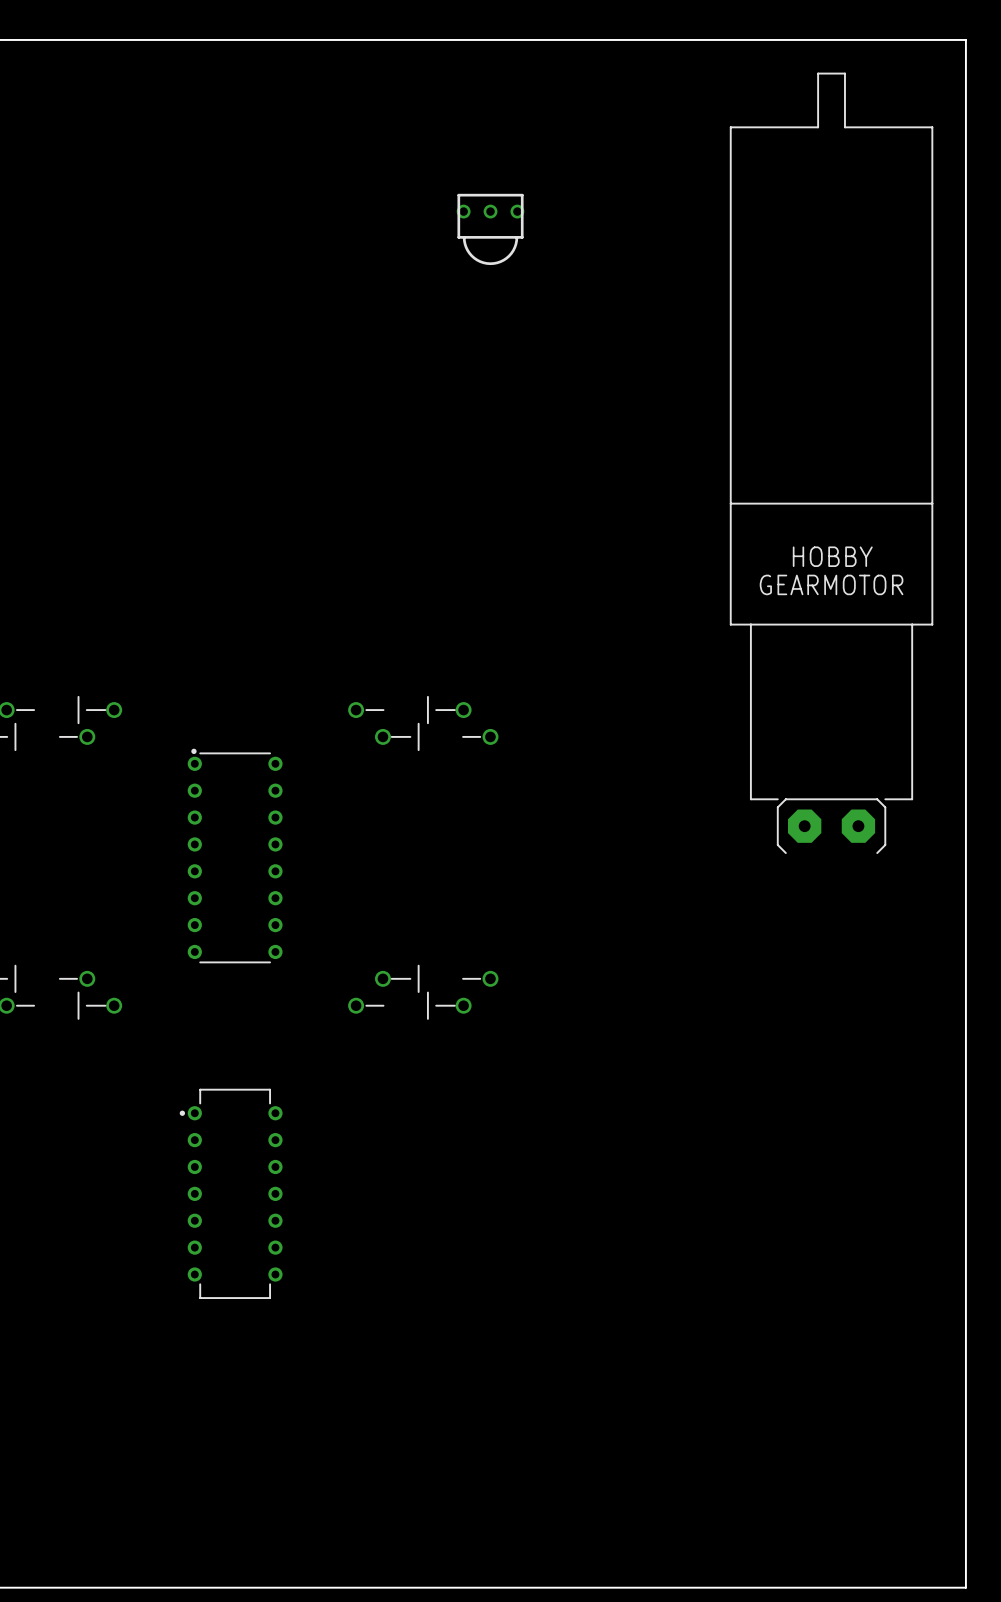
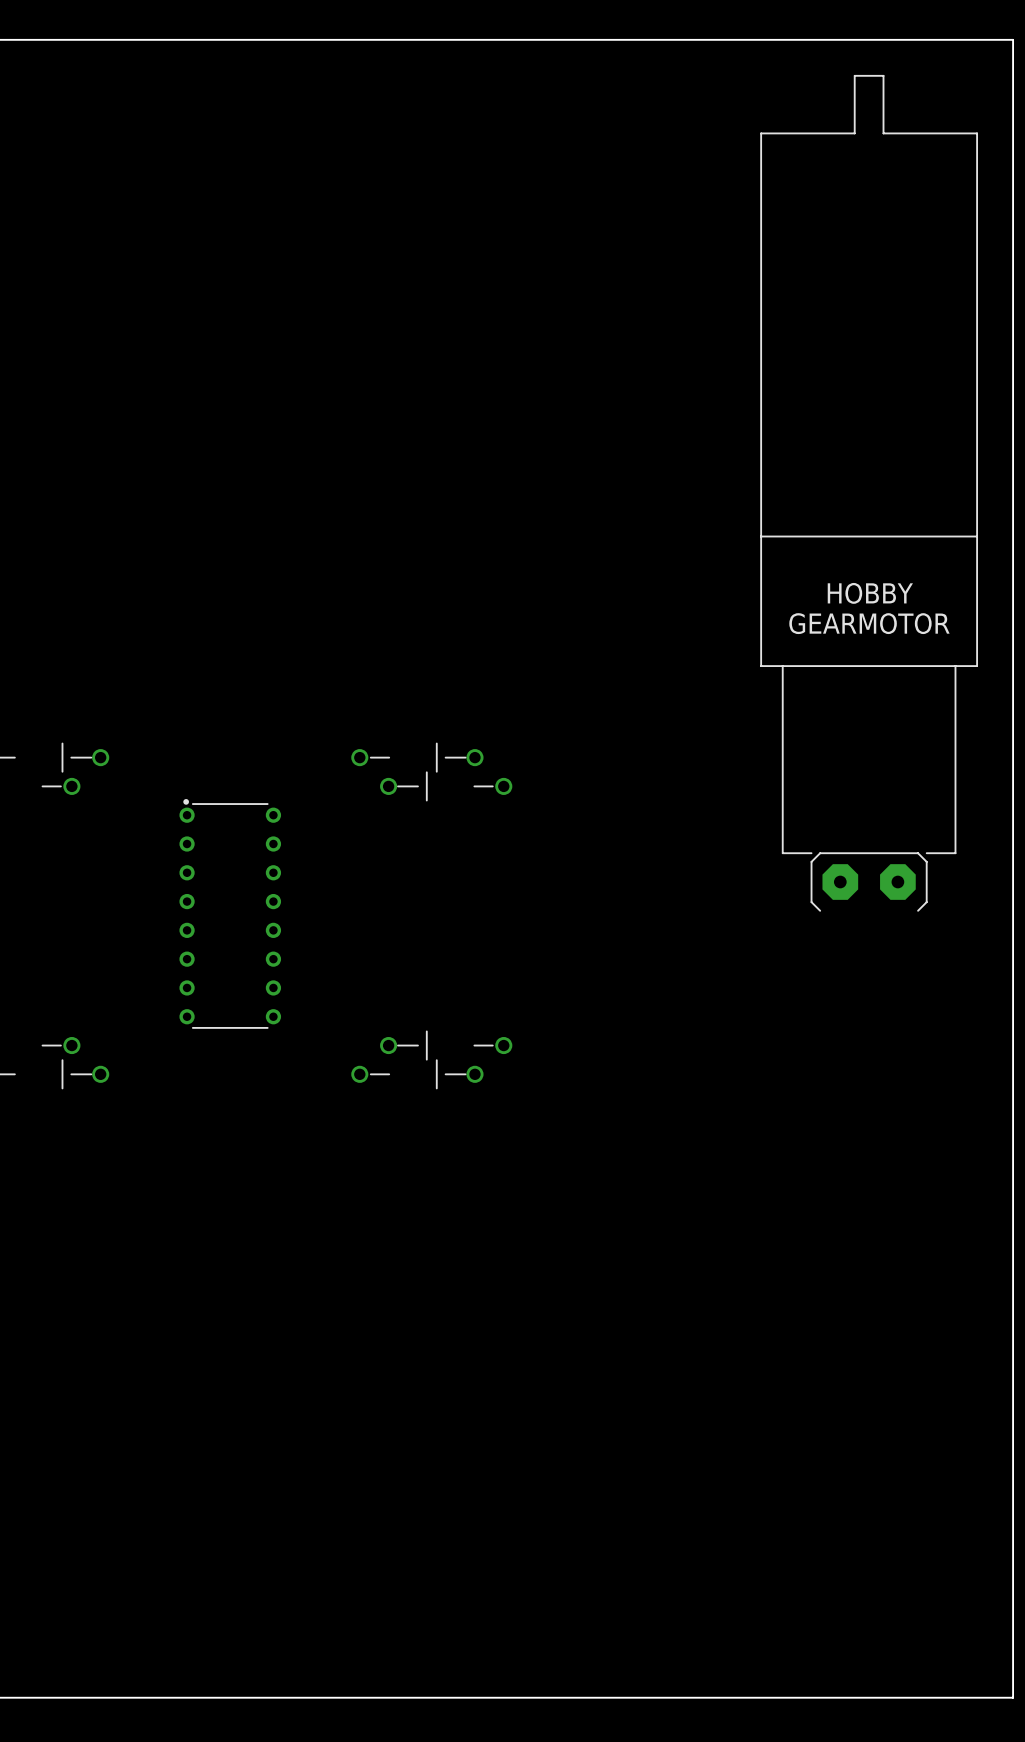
part: (490, 229) -> none
part: (231, 1193) -> none

